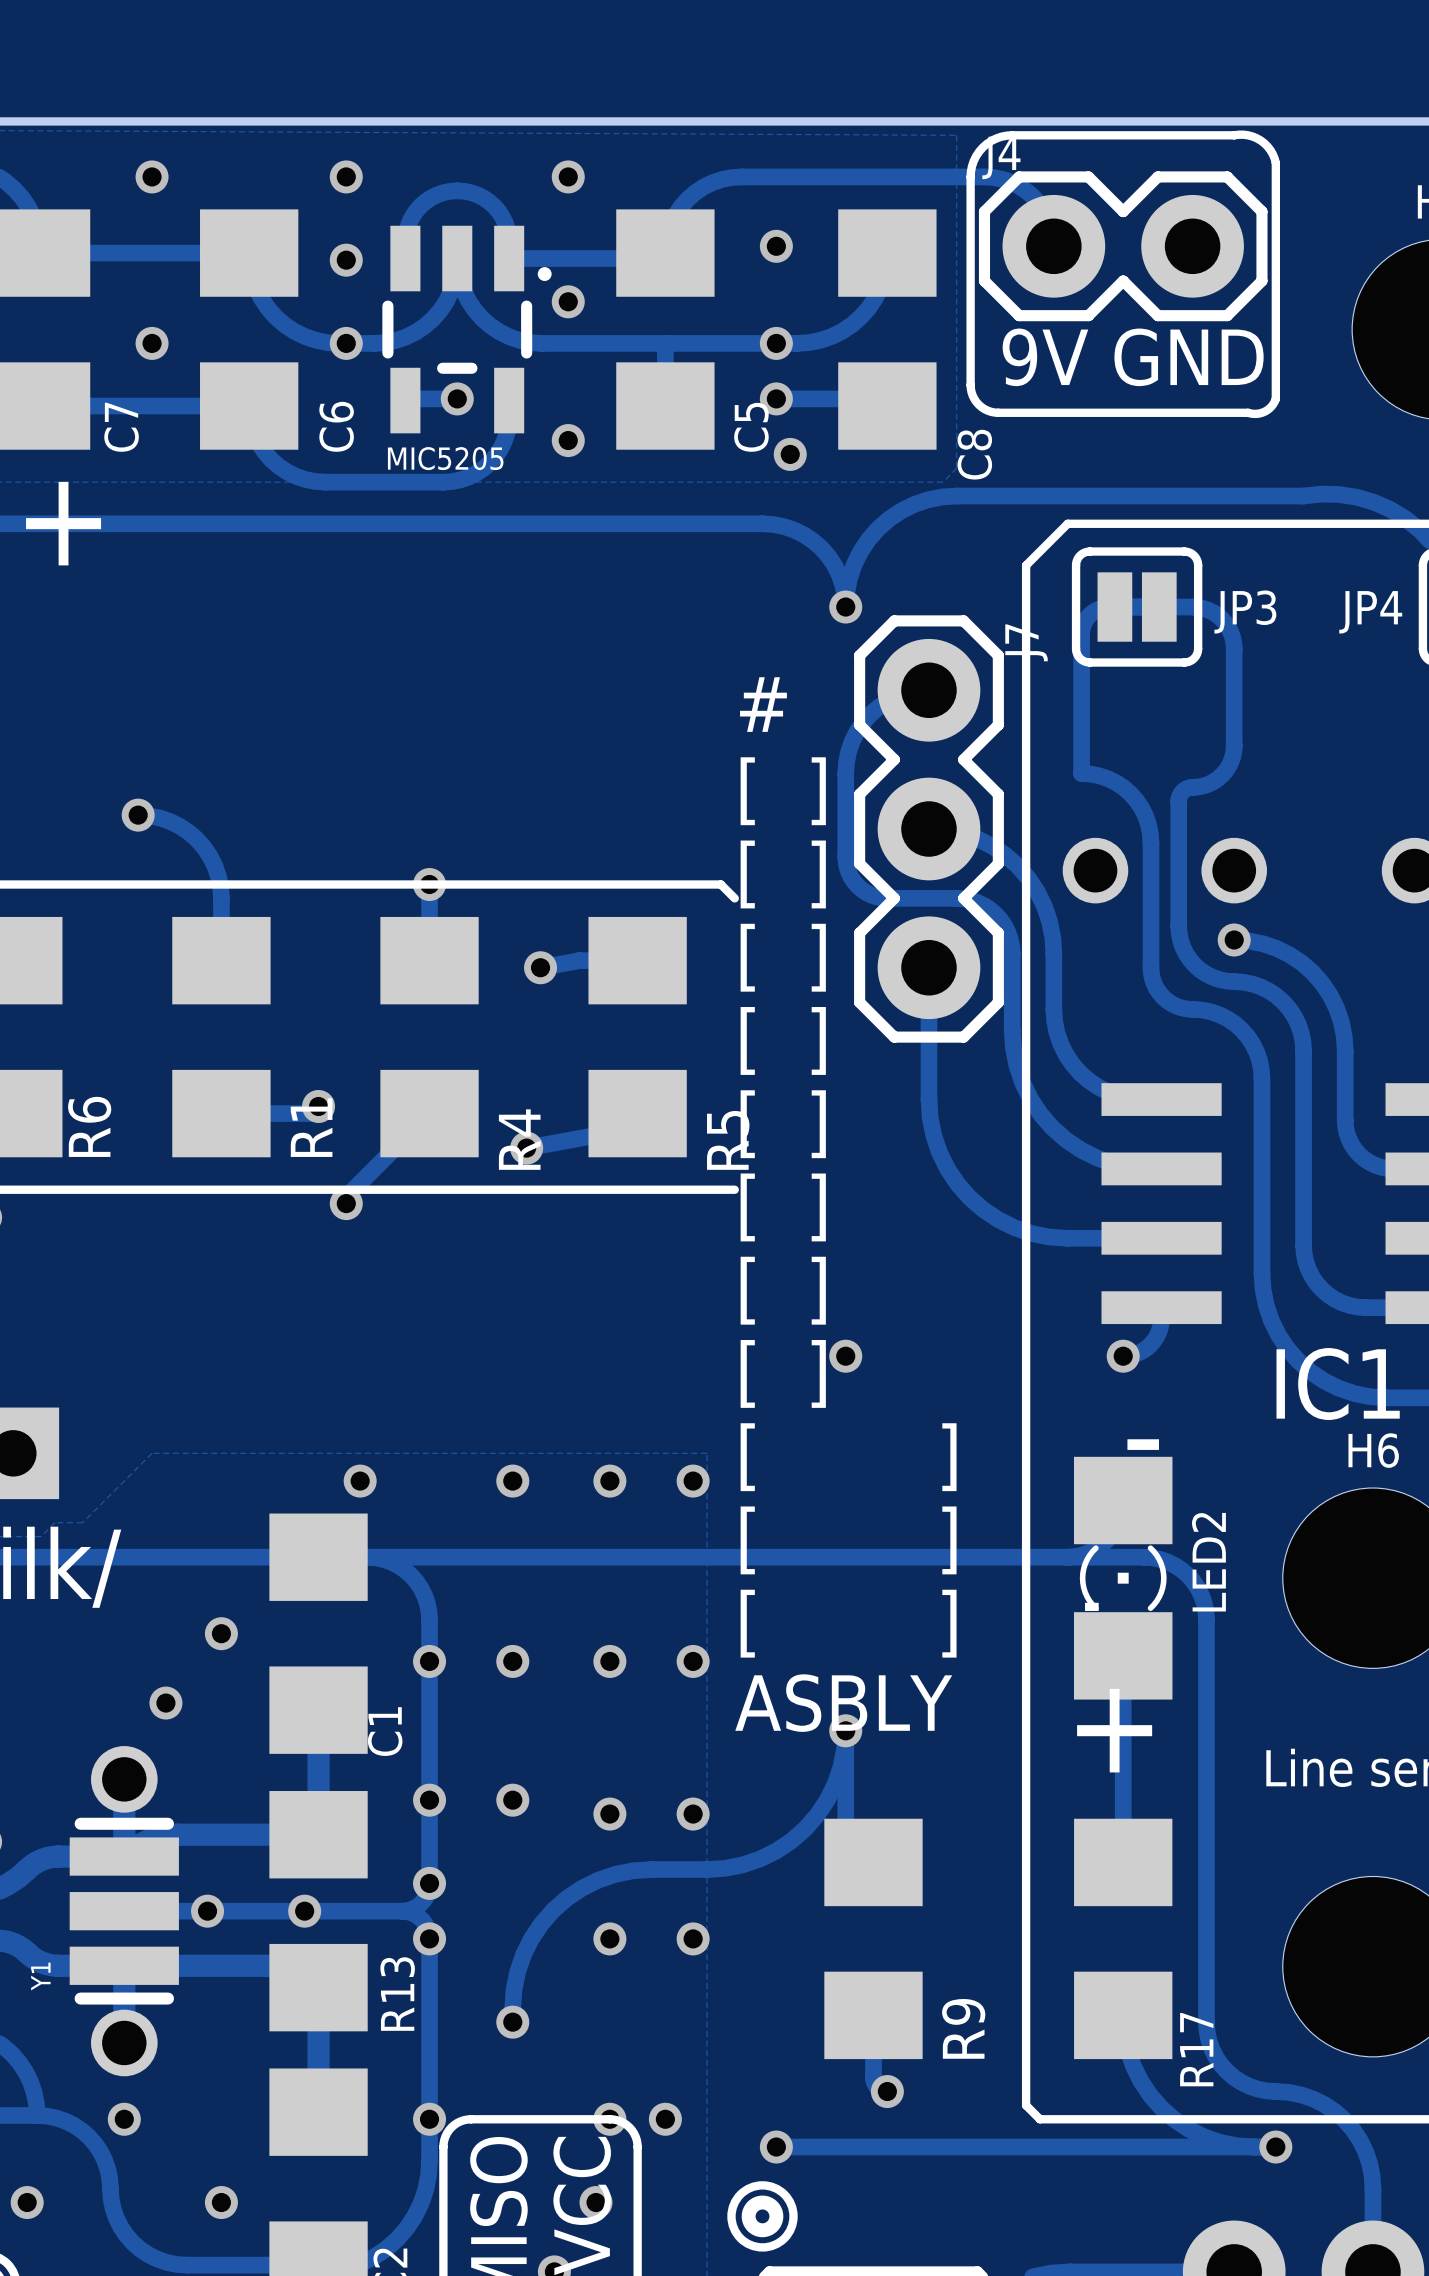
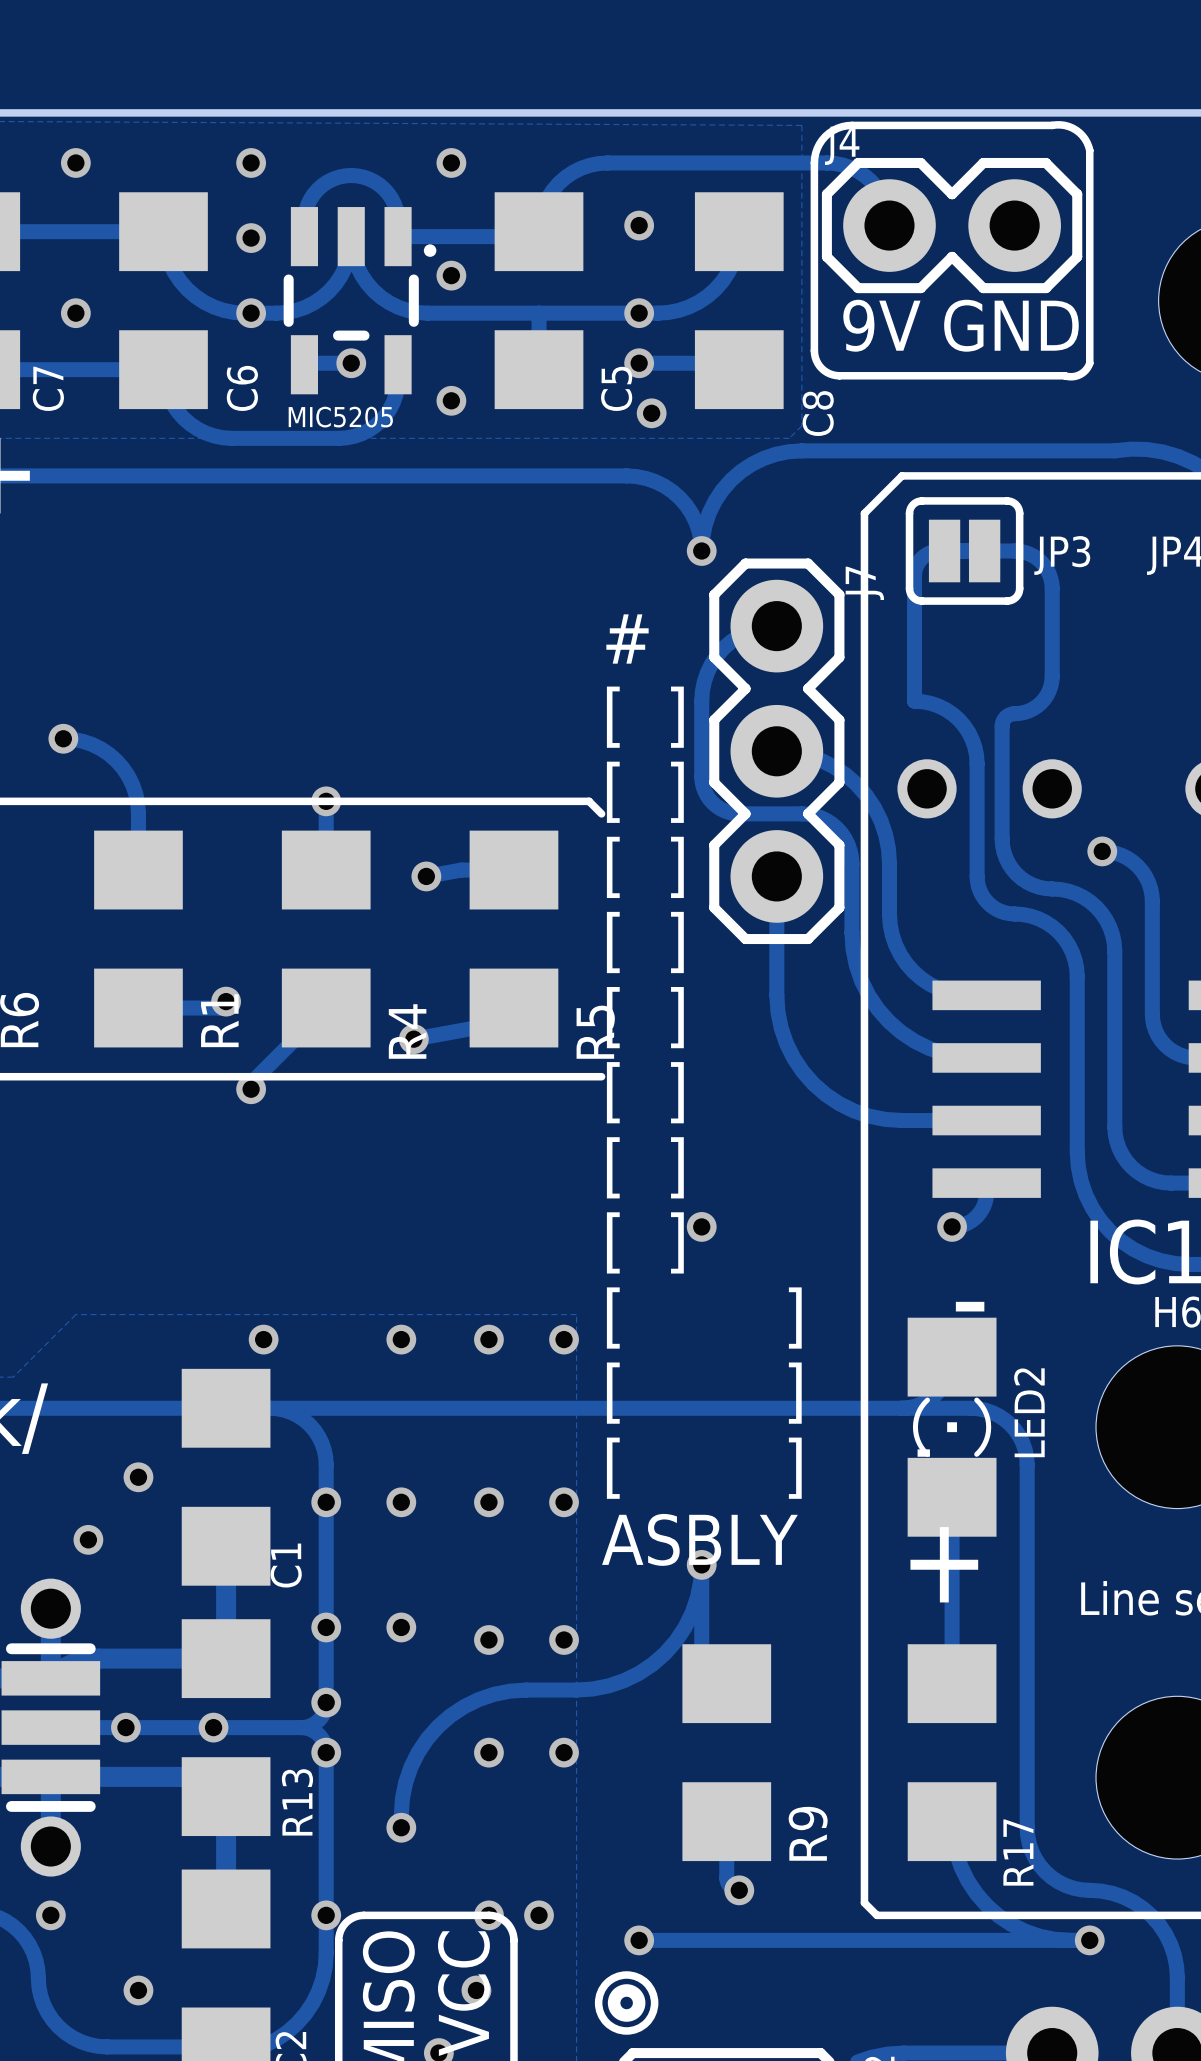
track: (1234, 940) (1248, 940) (1276, 948) (1301, 962) (1312, 972) (1322, 983) (1336, 1008) (1341, 1022) (1345, 1050) -> (1102, 851) (1115, 853) (1127, 858) (1137, 866) (1145, 876) (1151, 894) (1152, 951)
via position: (1234, 940) -> (1102, 851)

